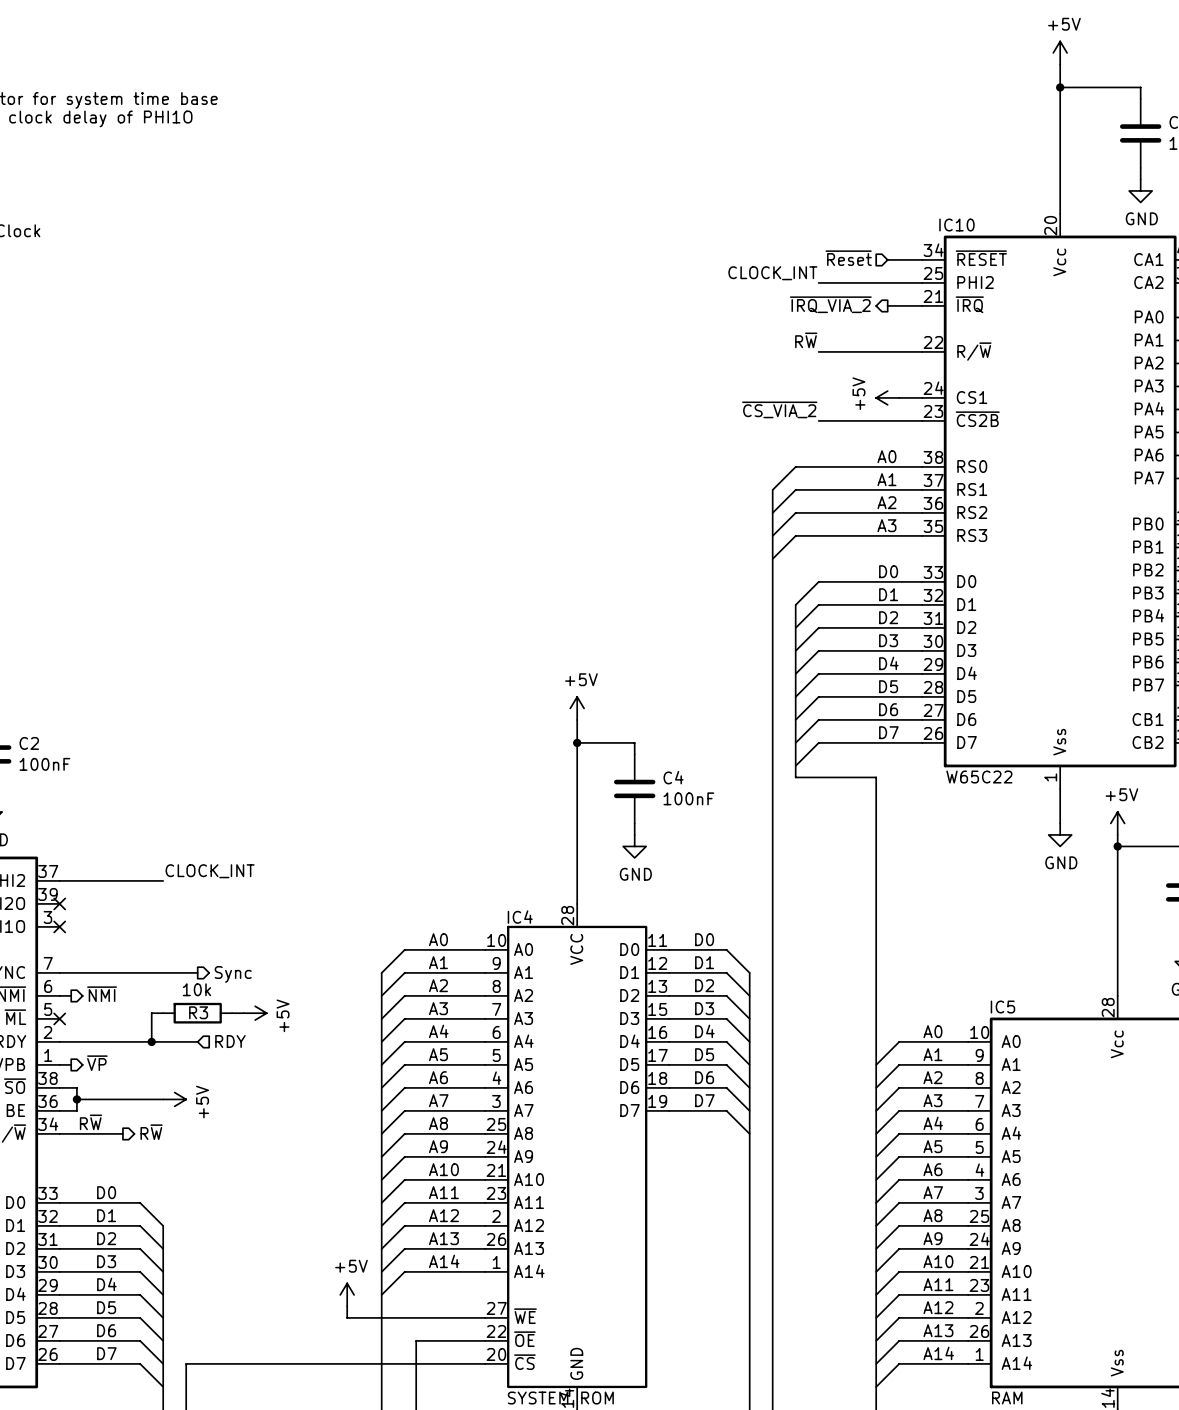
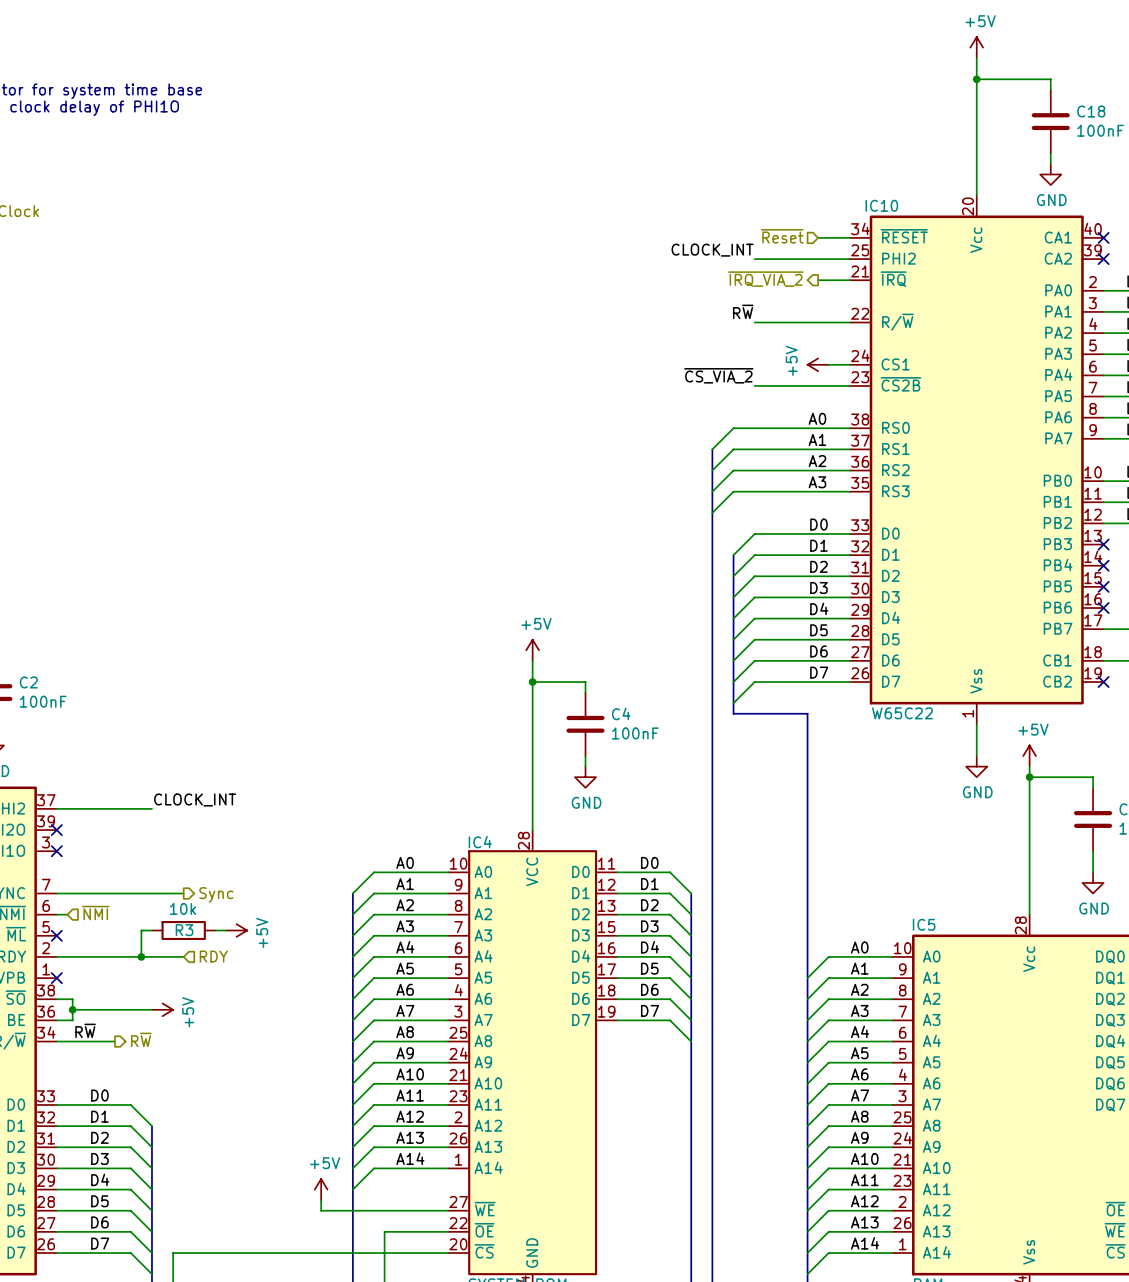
hierarchical label shape: output (102, 994) -> input (95, 913)
hierarchical label: ~{VP} (97, 1063) -> none
wire: (59, 1064) (71, 1064) -> none
no-connect mark: none -> (56, 978)

